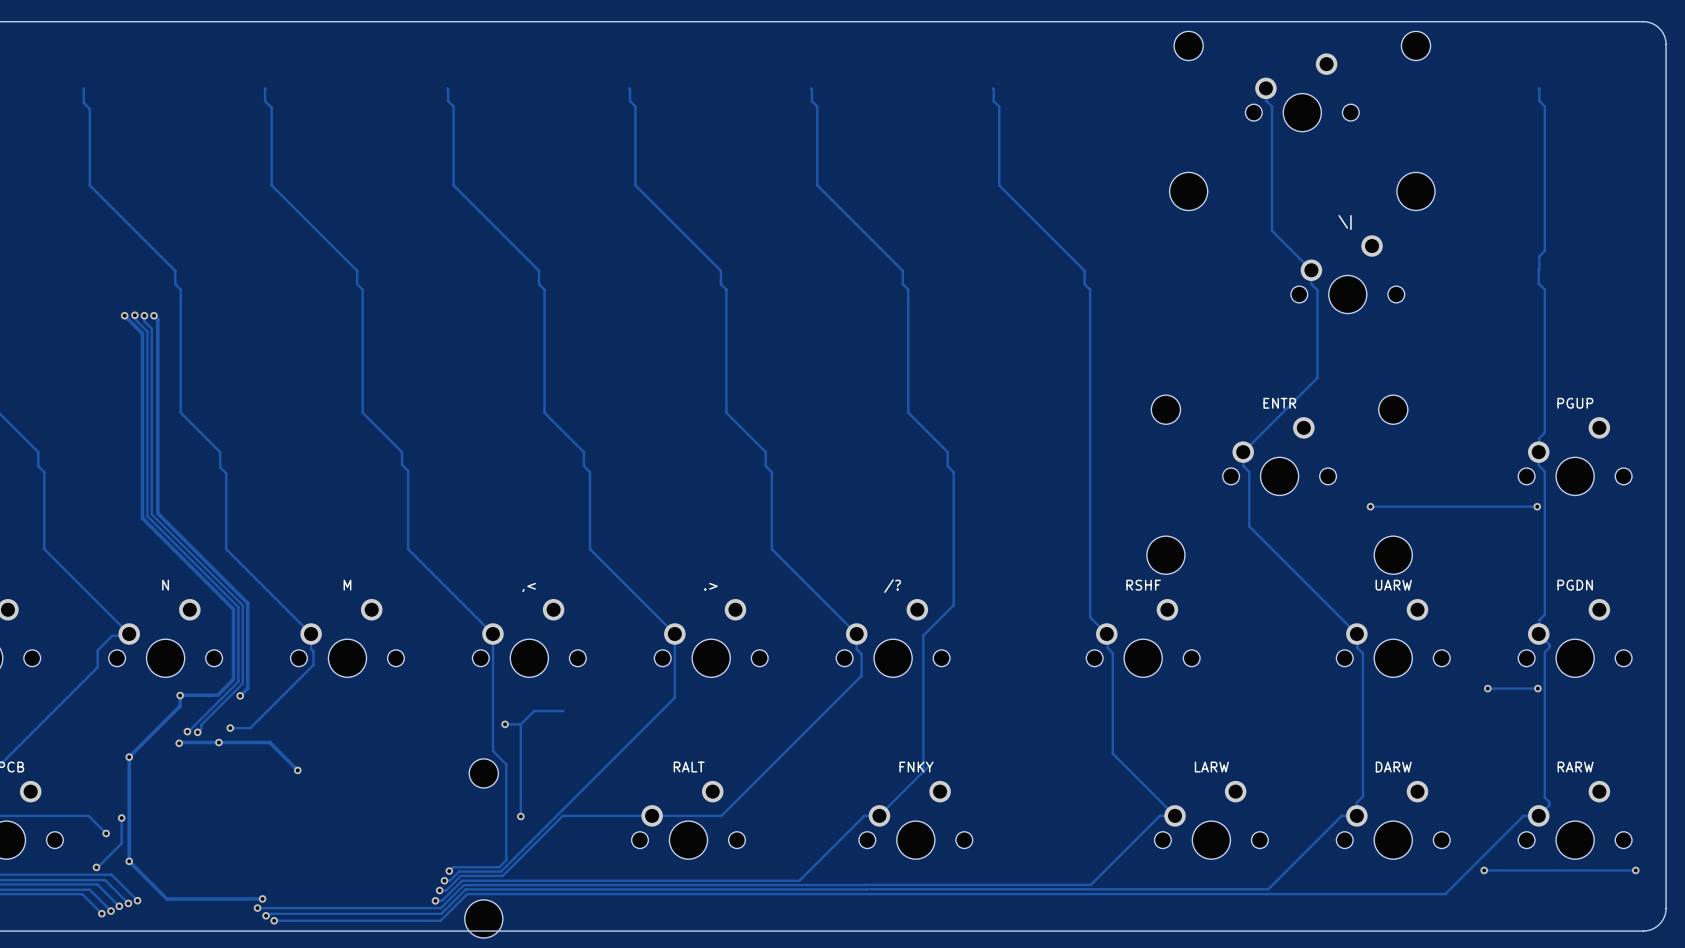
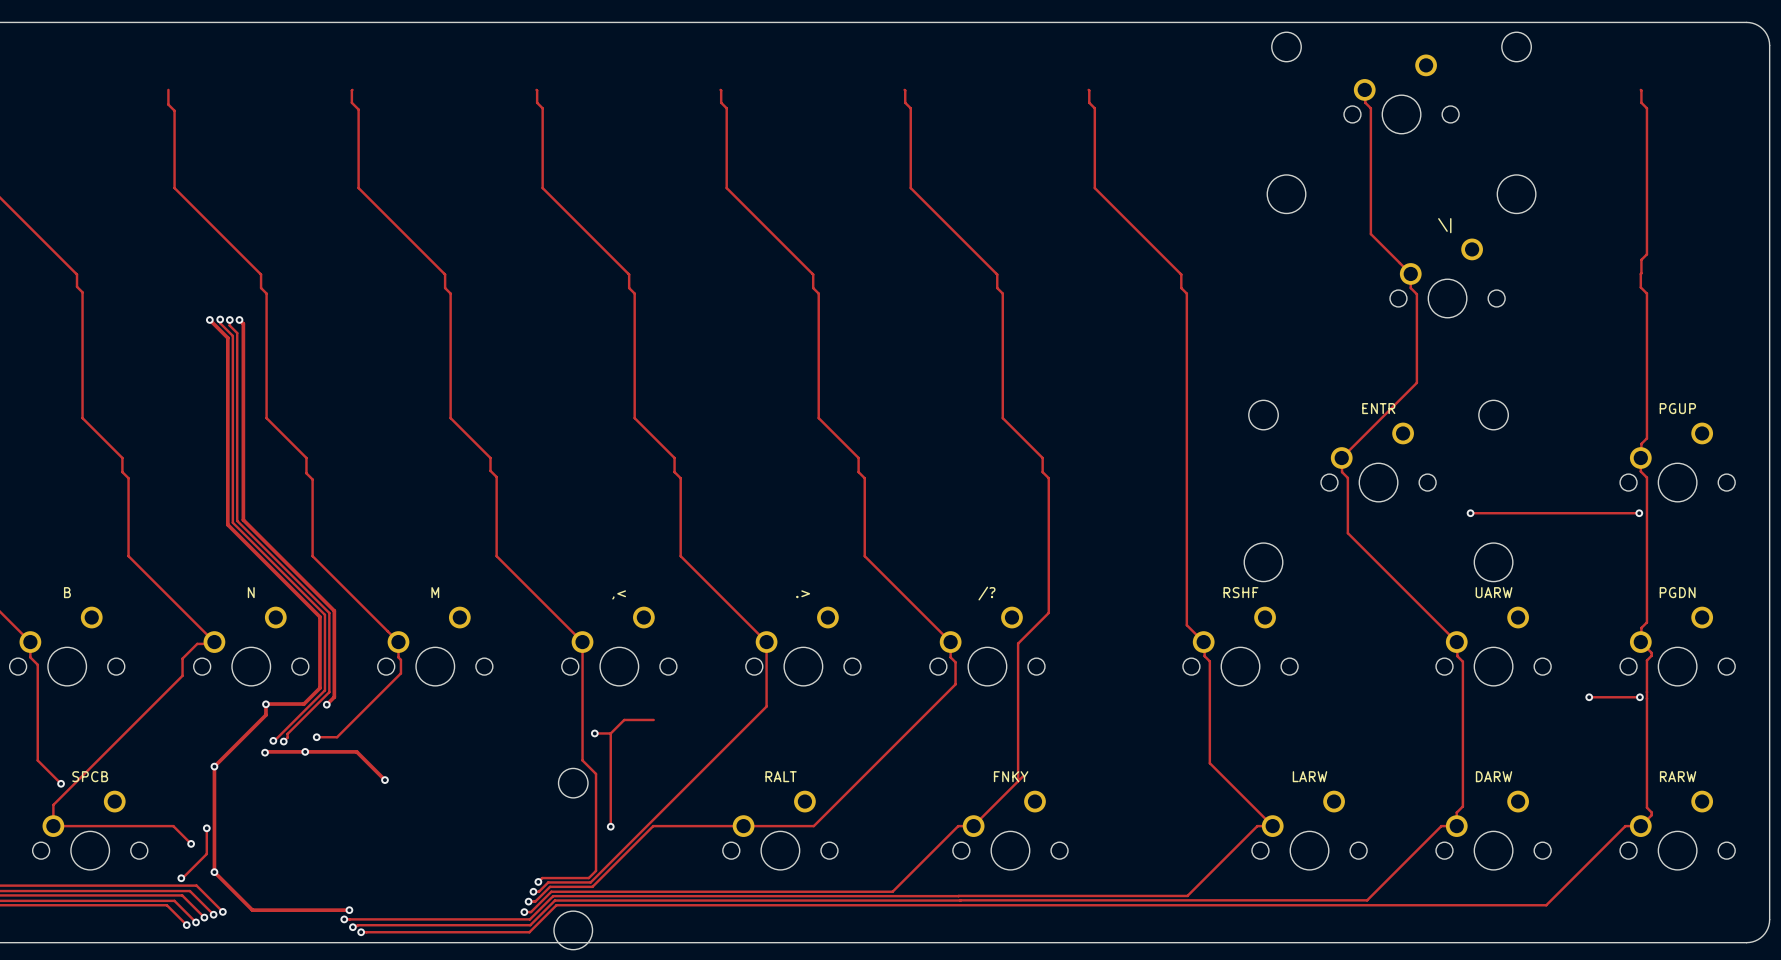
track: (1484, 870) (1635, 870) -> none
via: (1484, 870) -> none
via: (1635, 870) -> none

